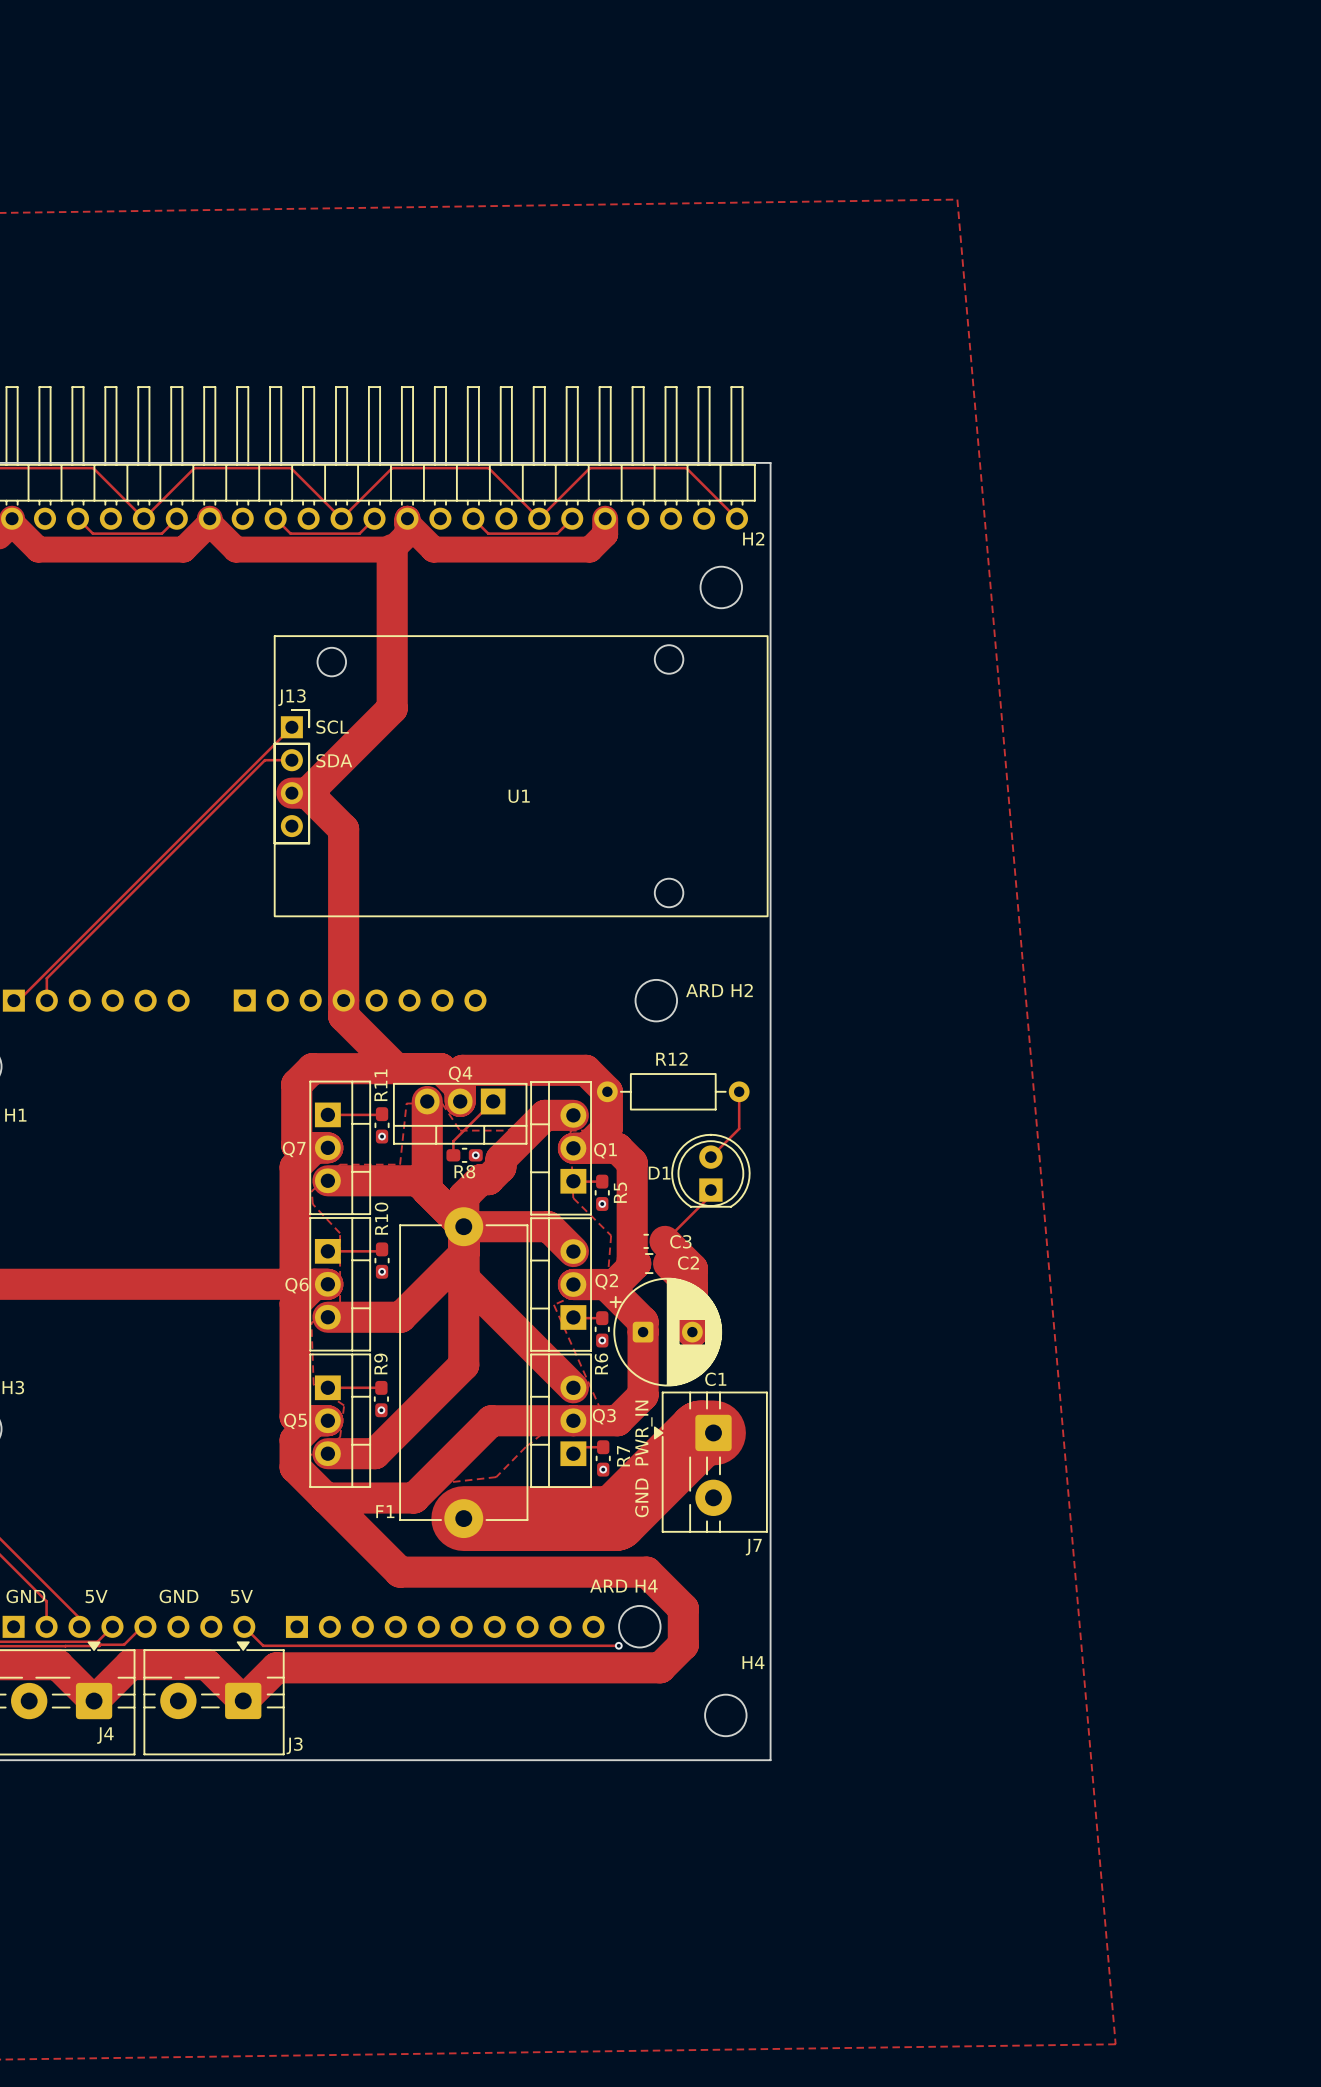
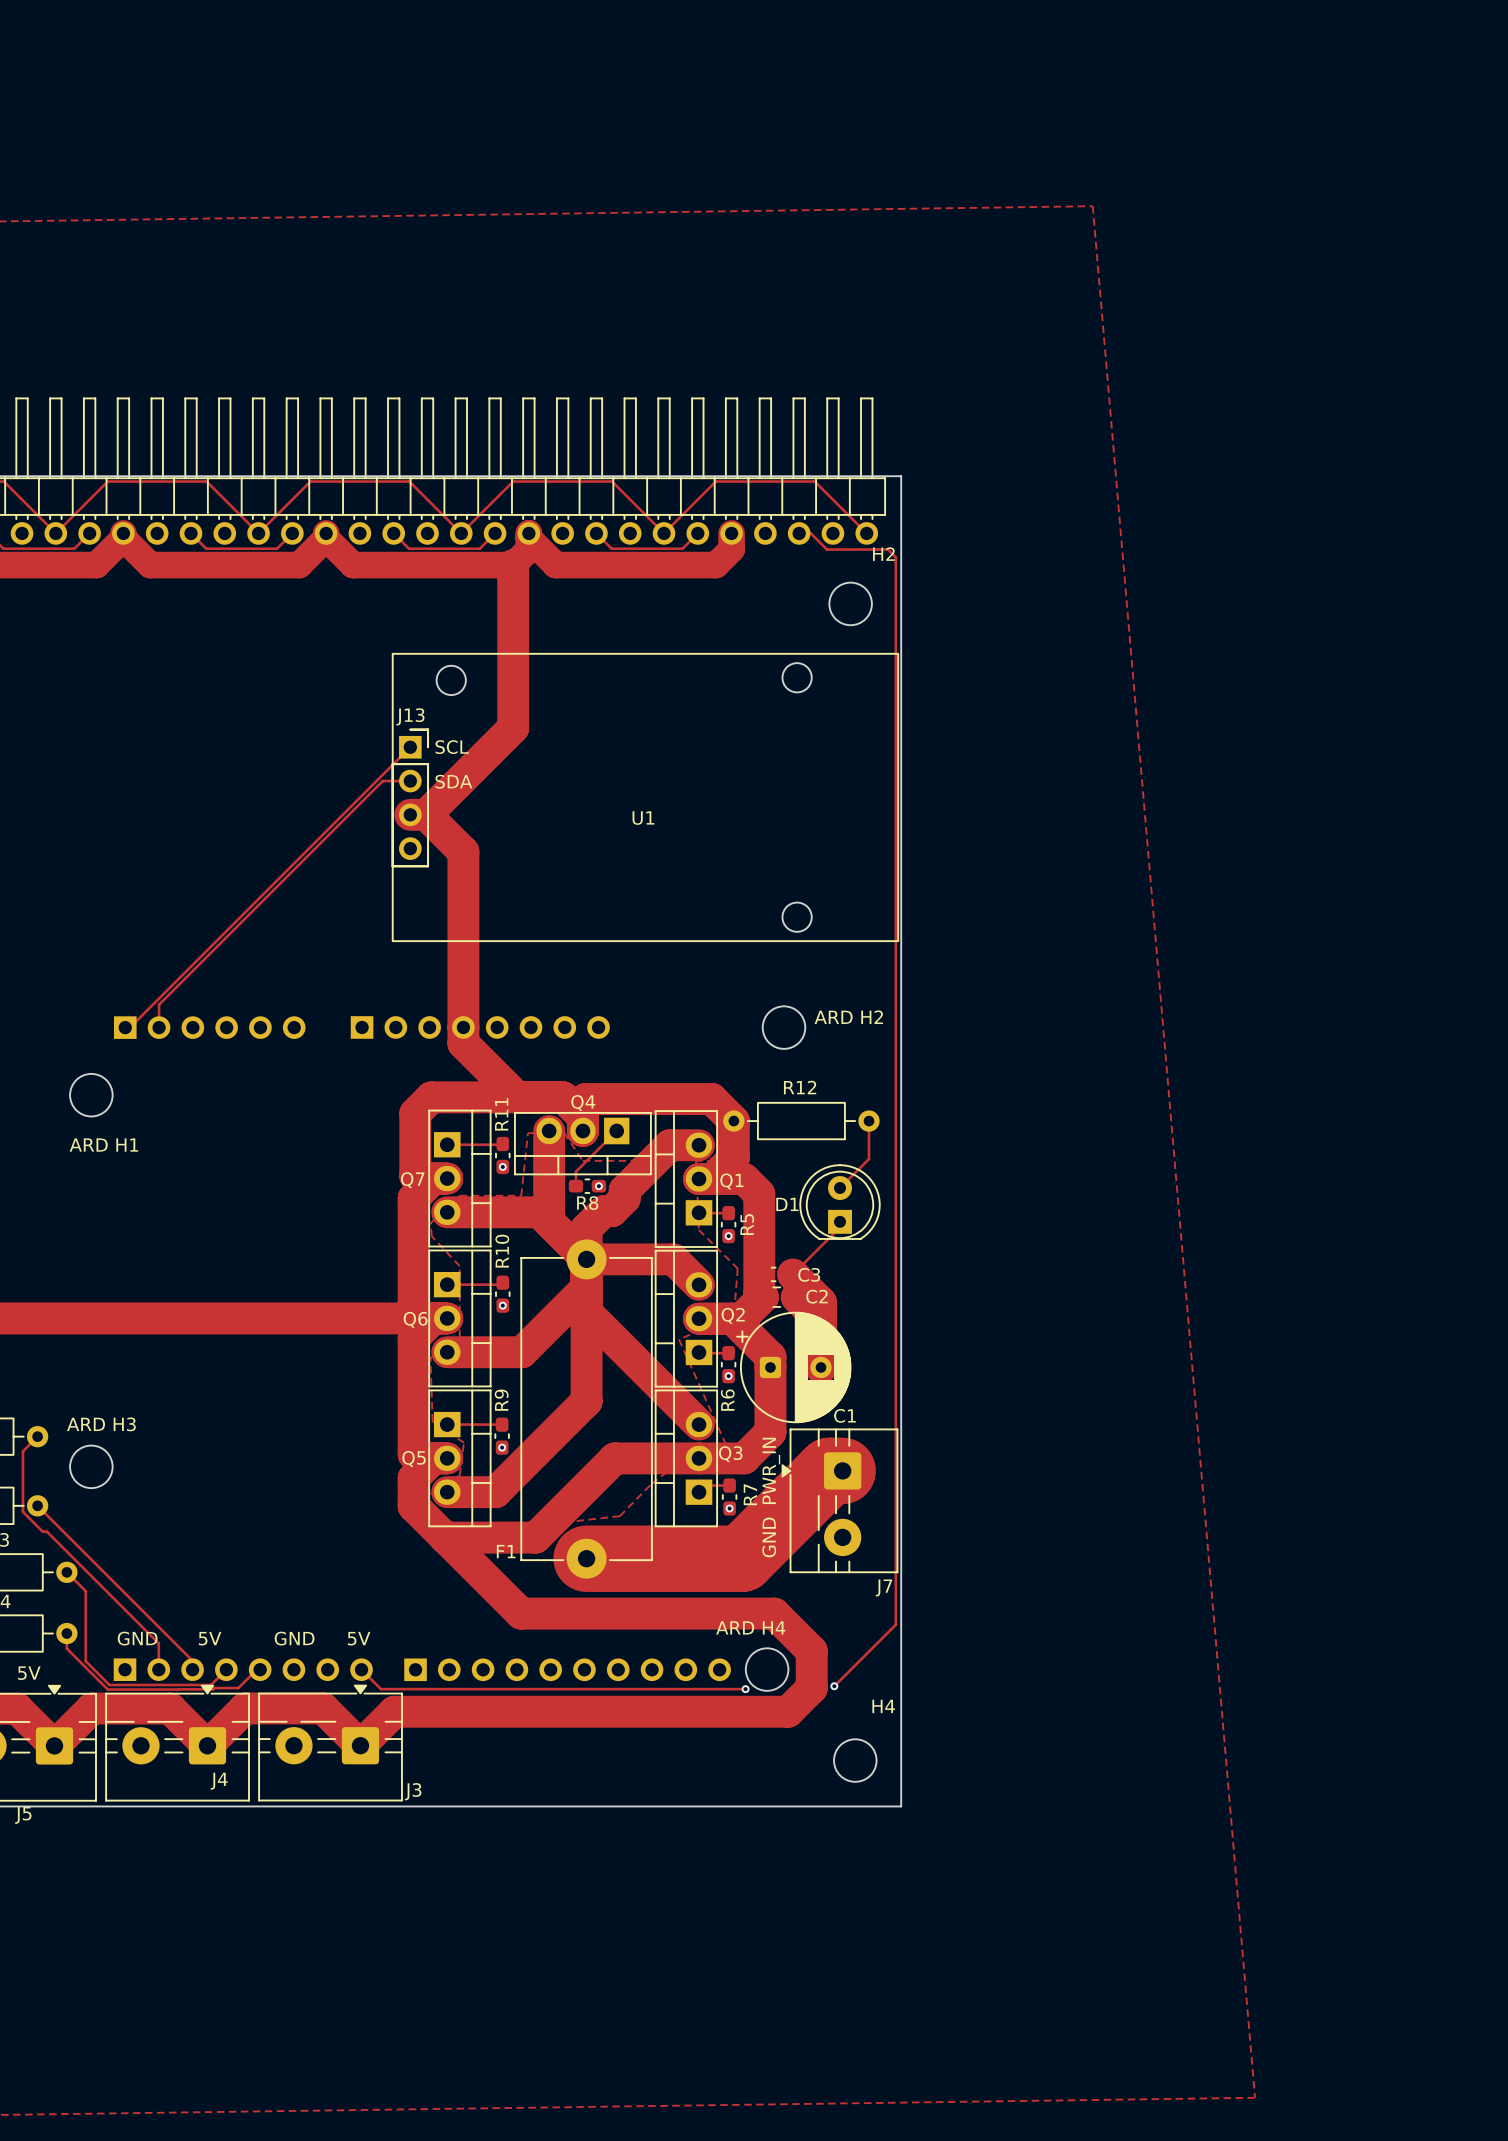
track: none -> (799, 533) (810, 533) (826, 549) (888, 549) (895, 557) (895, 1624) (834, 1686)
via: none -> (834, 1686)

